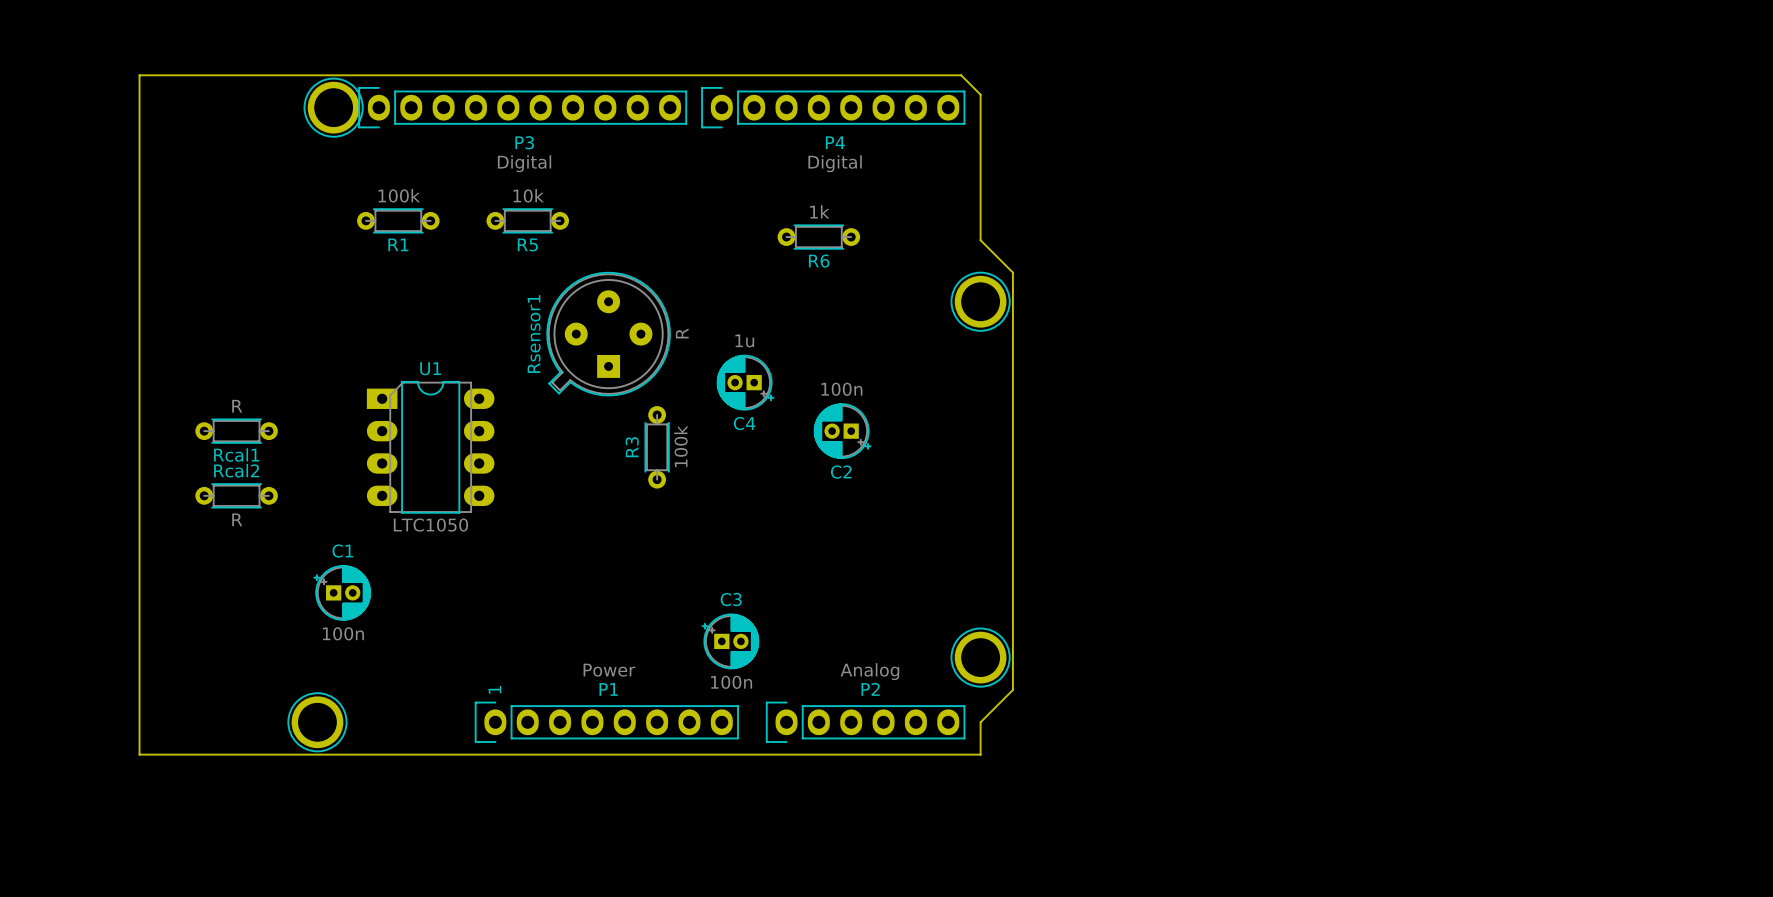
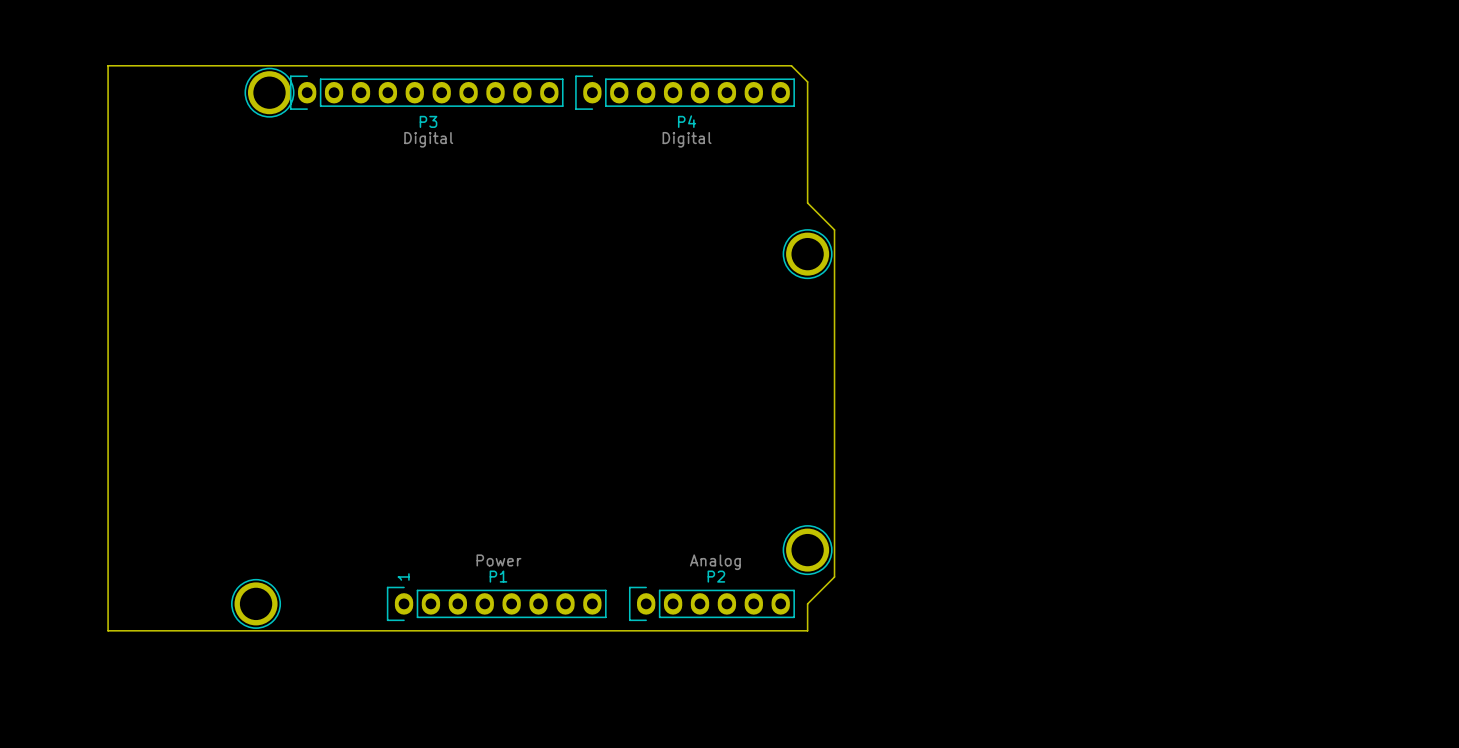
R1: 100k (398, 220) -> none
R5: 10k (527, 220) -> none
R6: 1k (818, 237) -> none
Rsensor1: R (608, 334) -> none
C4: 1u (745, 382) -> none
Rcal1: R (236, 431) -> none
C2: 100n (842, 431) -> none
U1: LTC1050 (430, 447) -> none
R3: 100k (657, 447) -> none
Rcal2: R (236, 495) -> none
C1: 100n (342, 592) -> none
C3: 100n (730, 641) -> none

